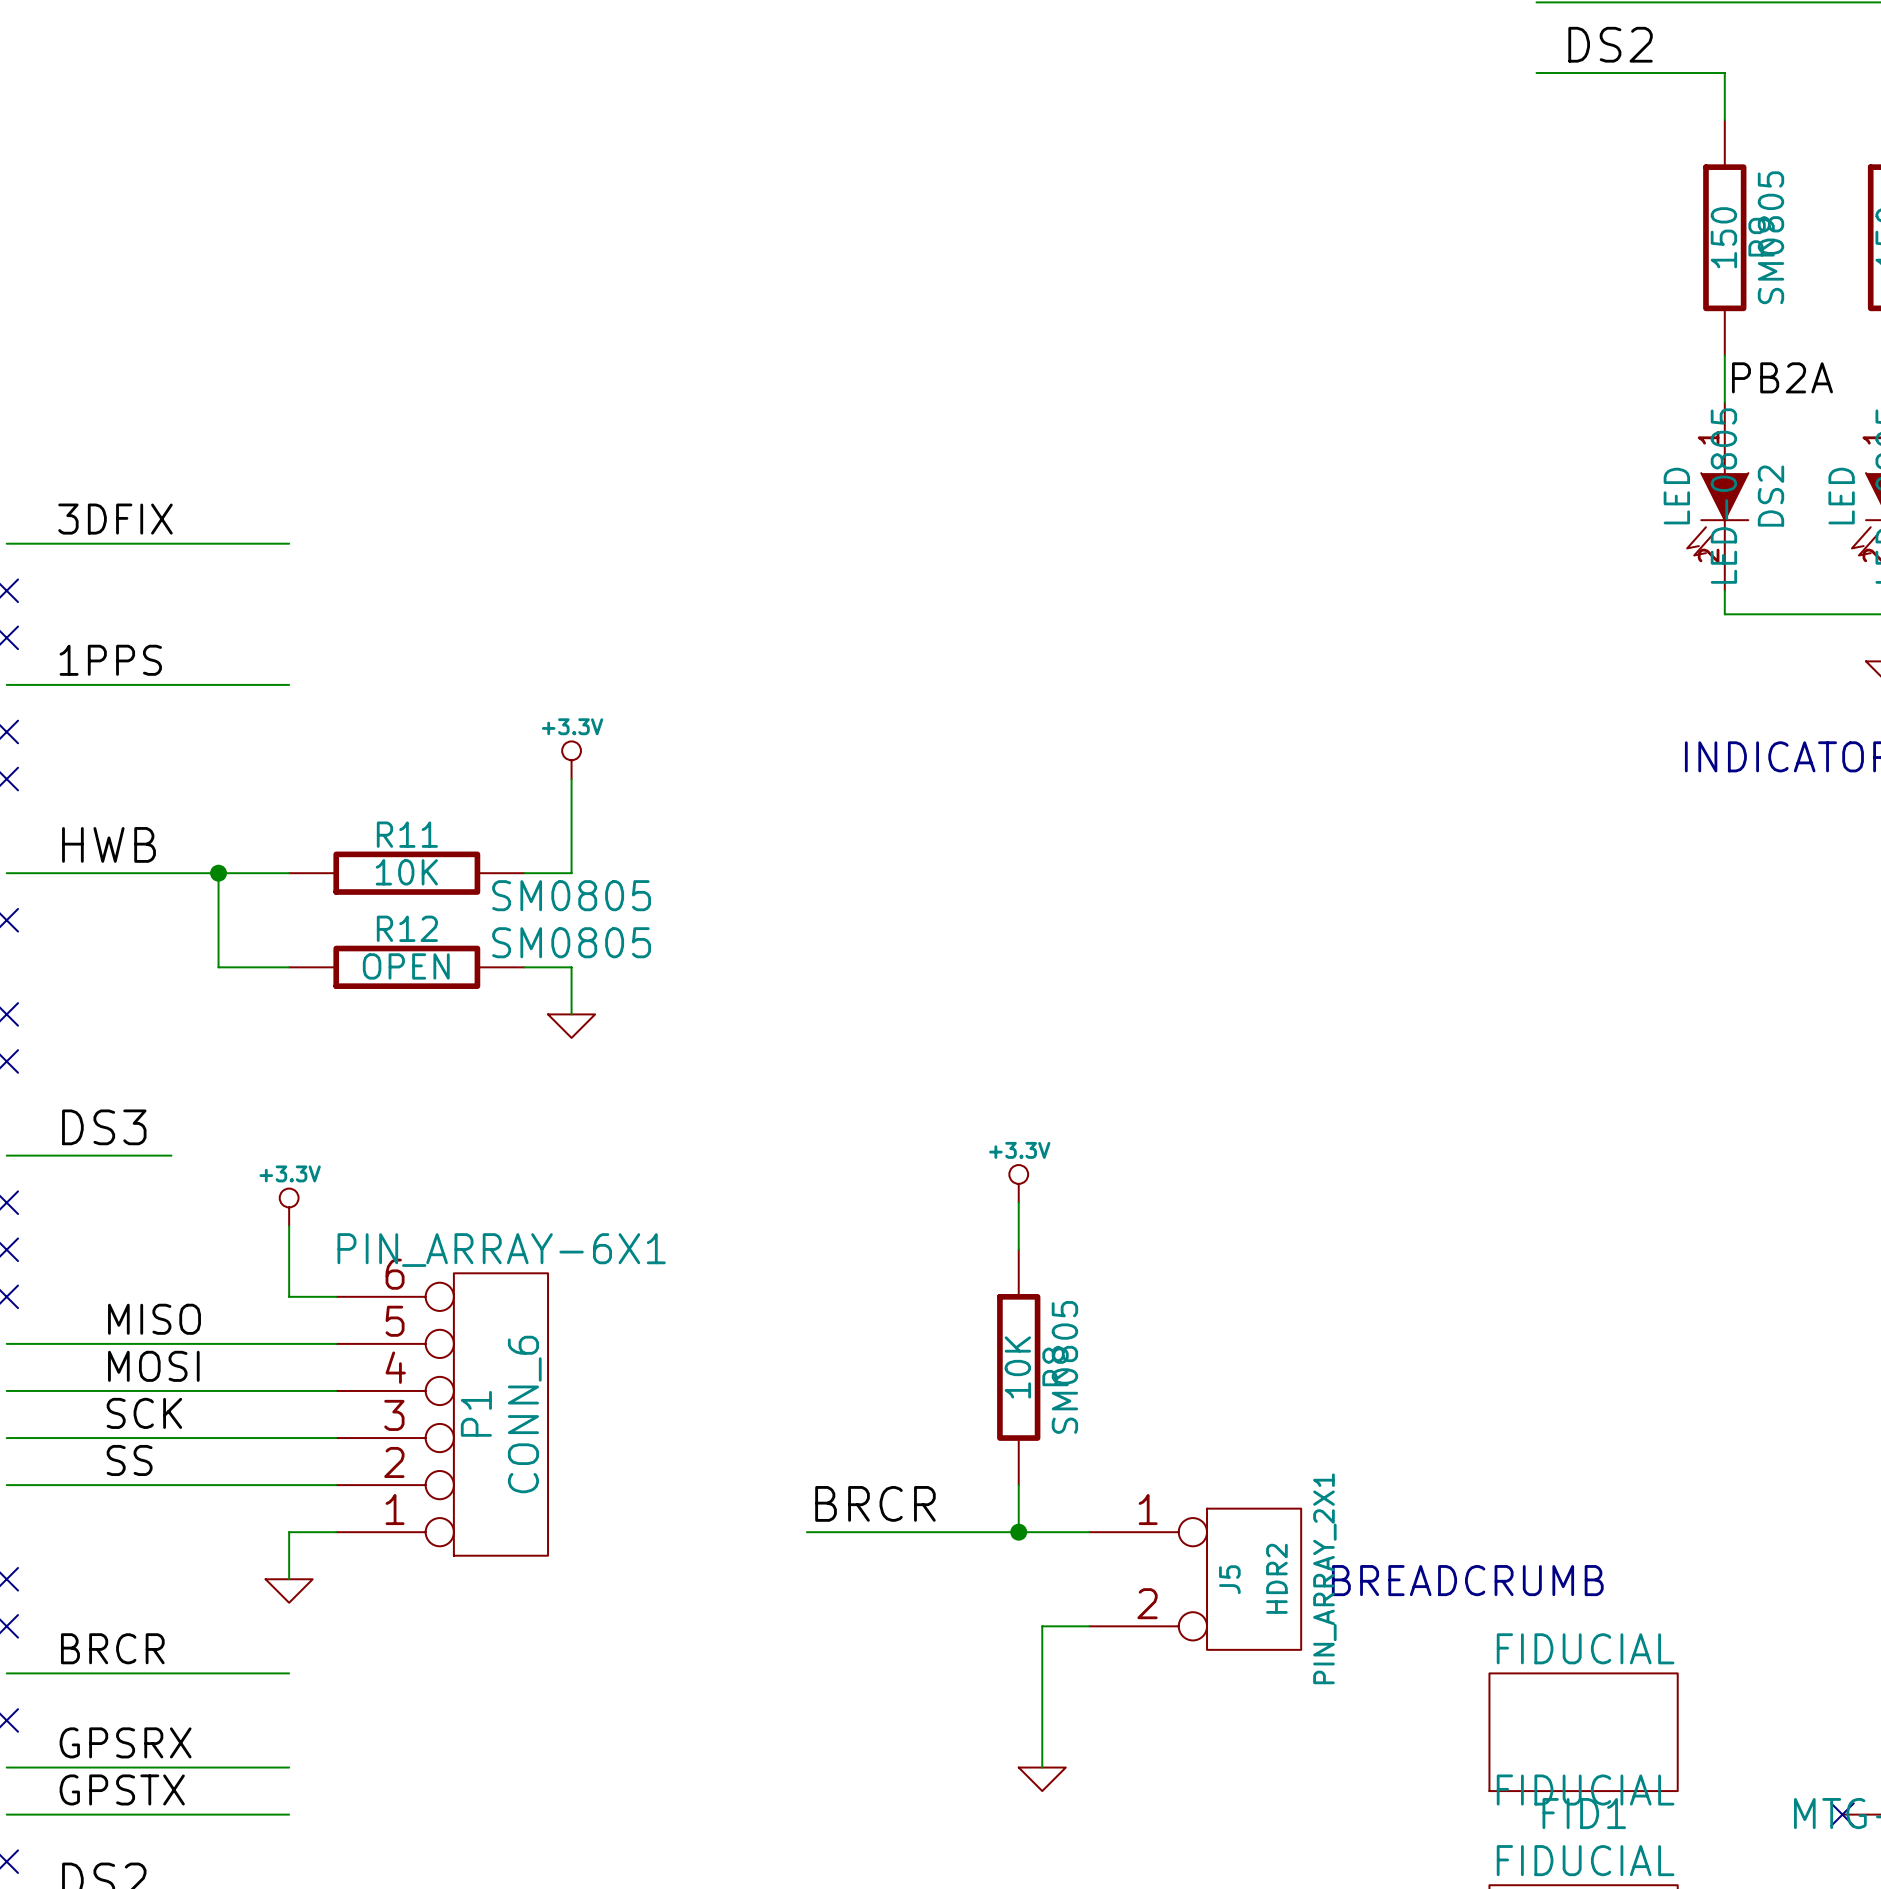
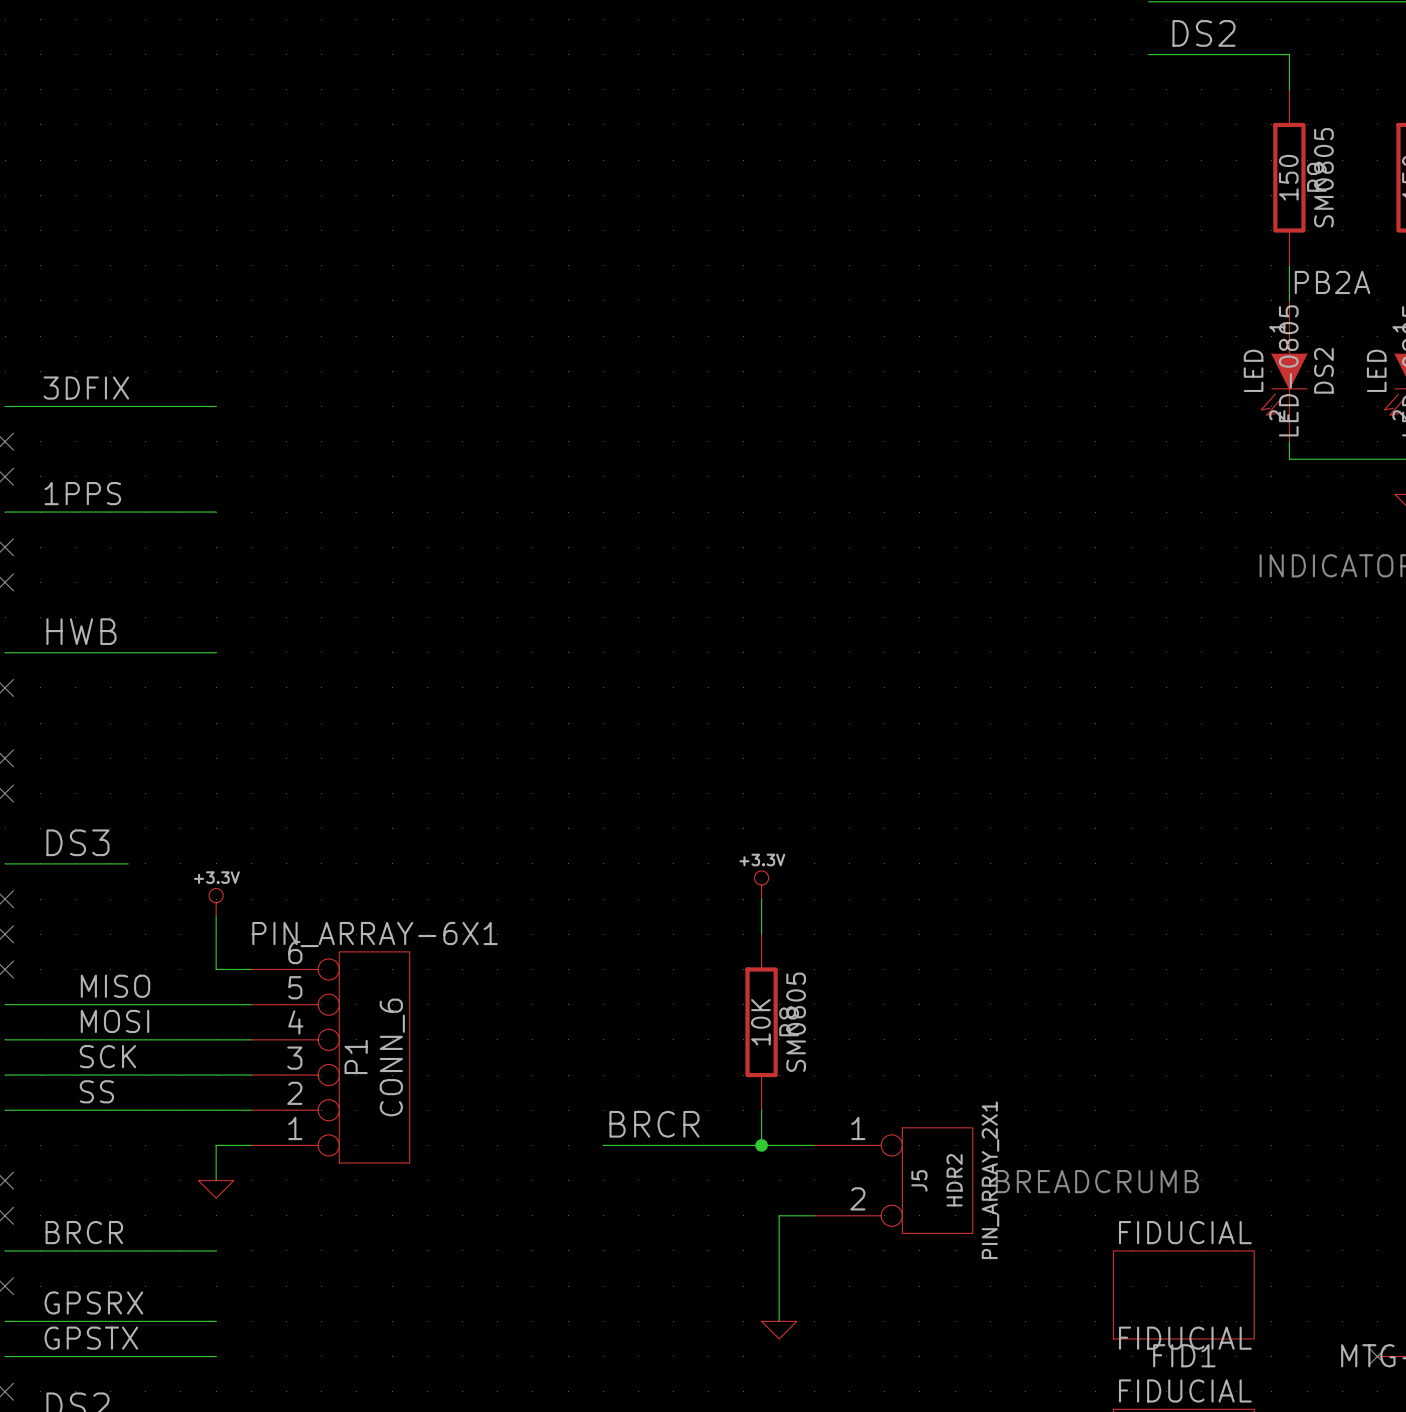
power symbol: +3.3V (571, 760) -> none
wire: (571, 779) (571, 873) (524, 873) -> none
wire: (218, 873) (218, 967) (289, 967) -> none
junction: (218, 873) -> none
R11: 10K (406, 873) -> none
R12: OPEN (406, 967) -> none
wire: (524, 967) (571, 967) (571, 1014) -> none
power symbol: (571, 1026) -> none

